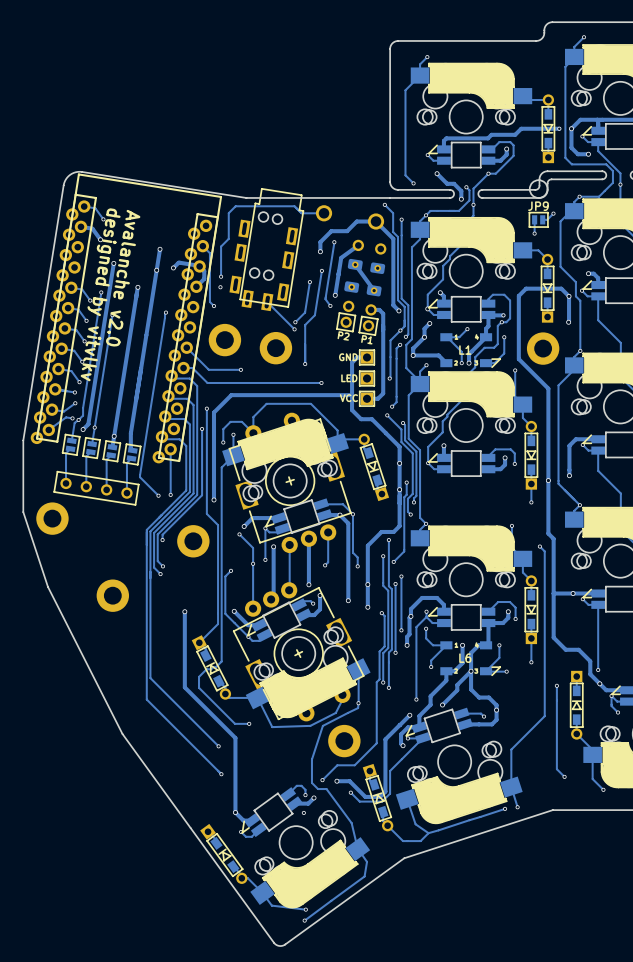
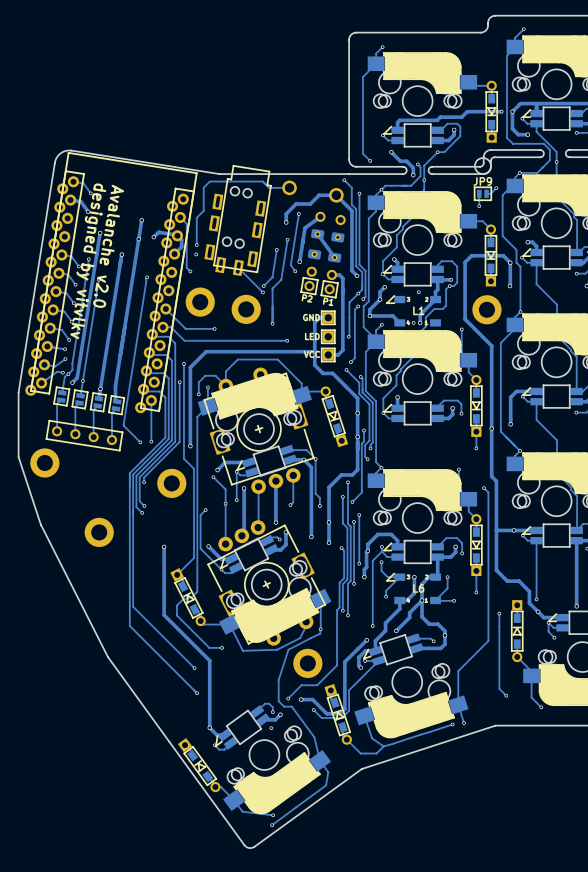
track: (467, 329) (459, 337) (446, 337) -> none
track: (447, 337) (461, 351) (461, 363) -> none
track: (504, 337) (504, 353) (494, 363) (486, 363) -> none
via: (504, 337) -> none
part rotation: 0° (470, 350) -> 180° (413, 311)
part rotation: 0° (470, 658) -> 180° (413, 588)

